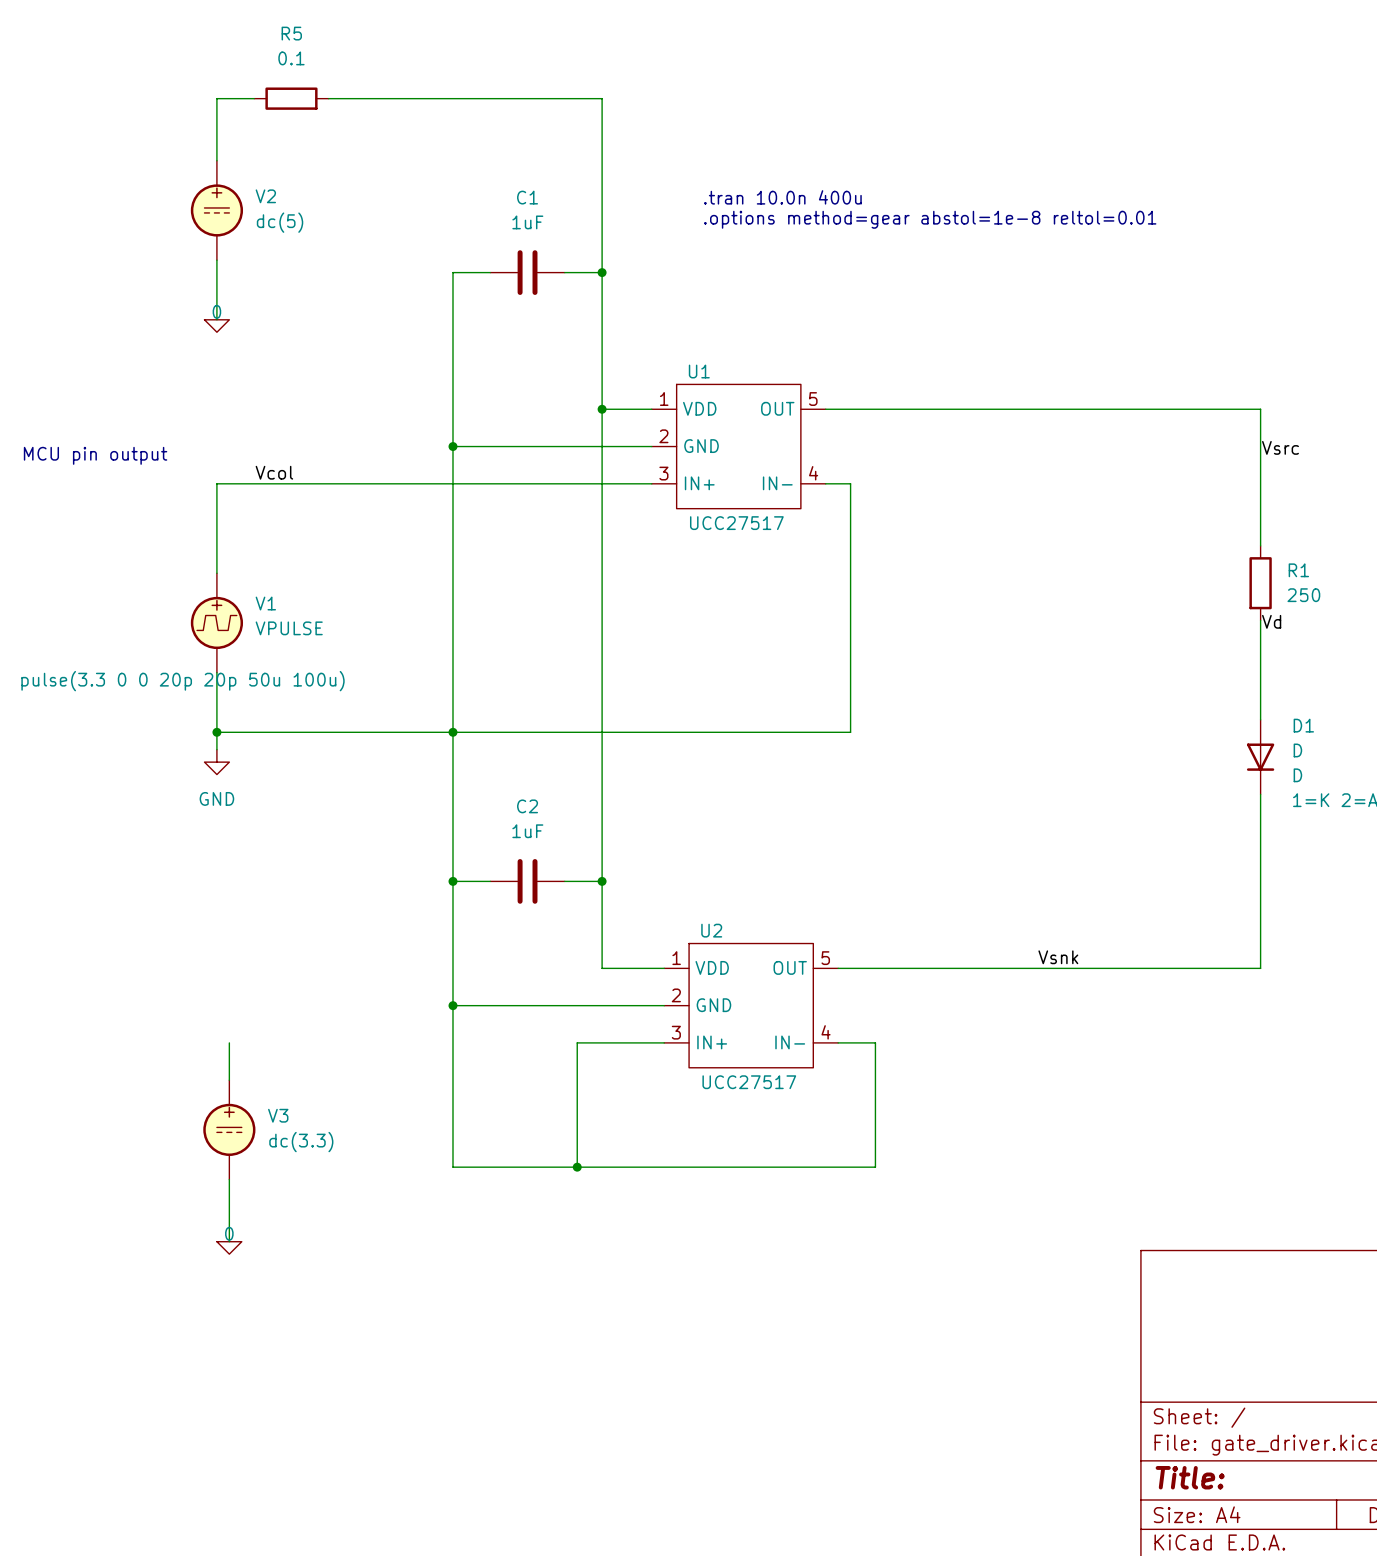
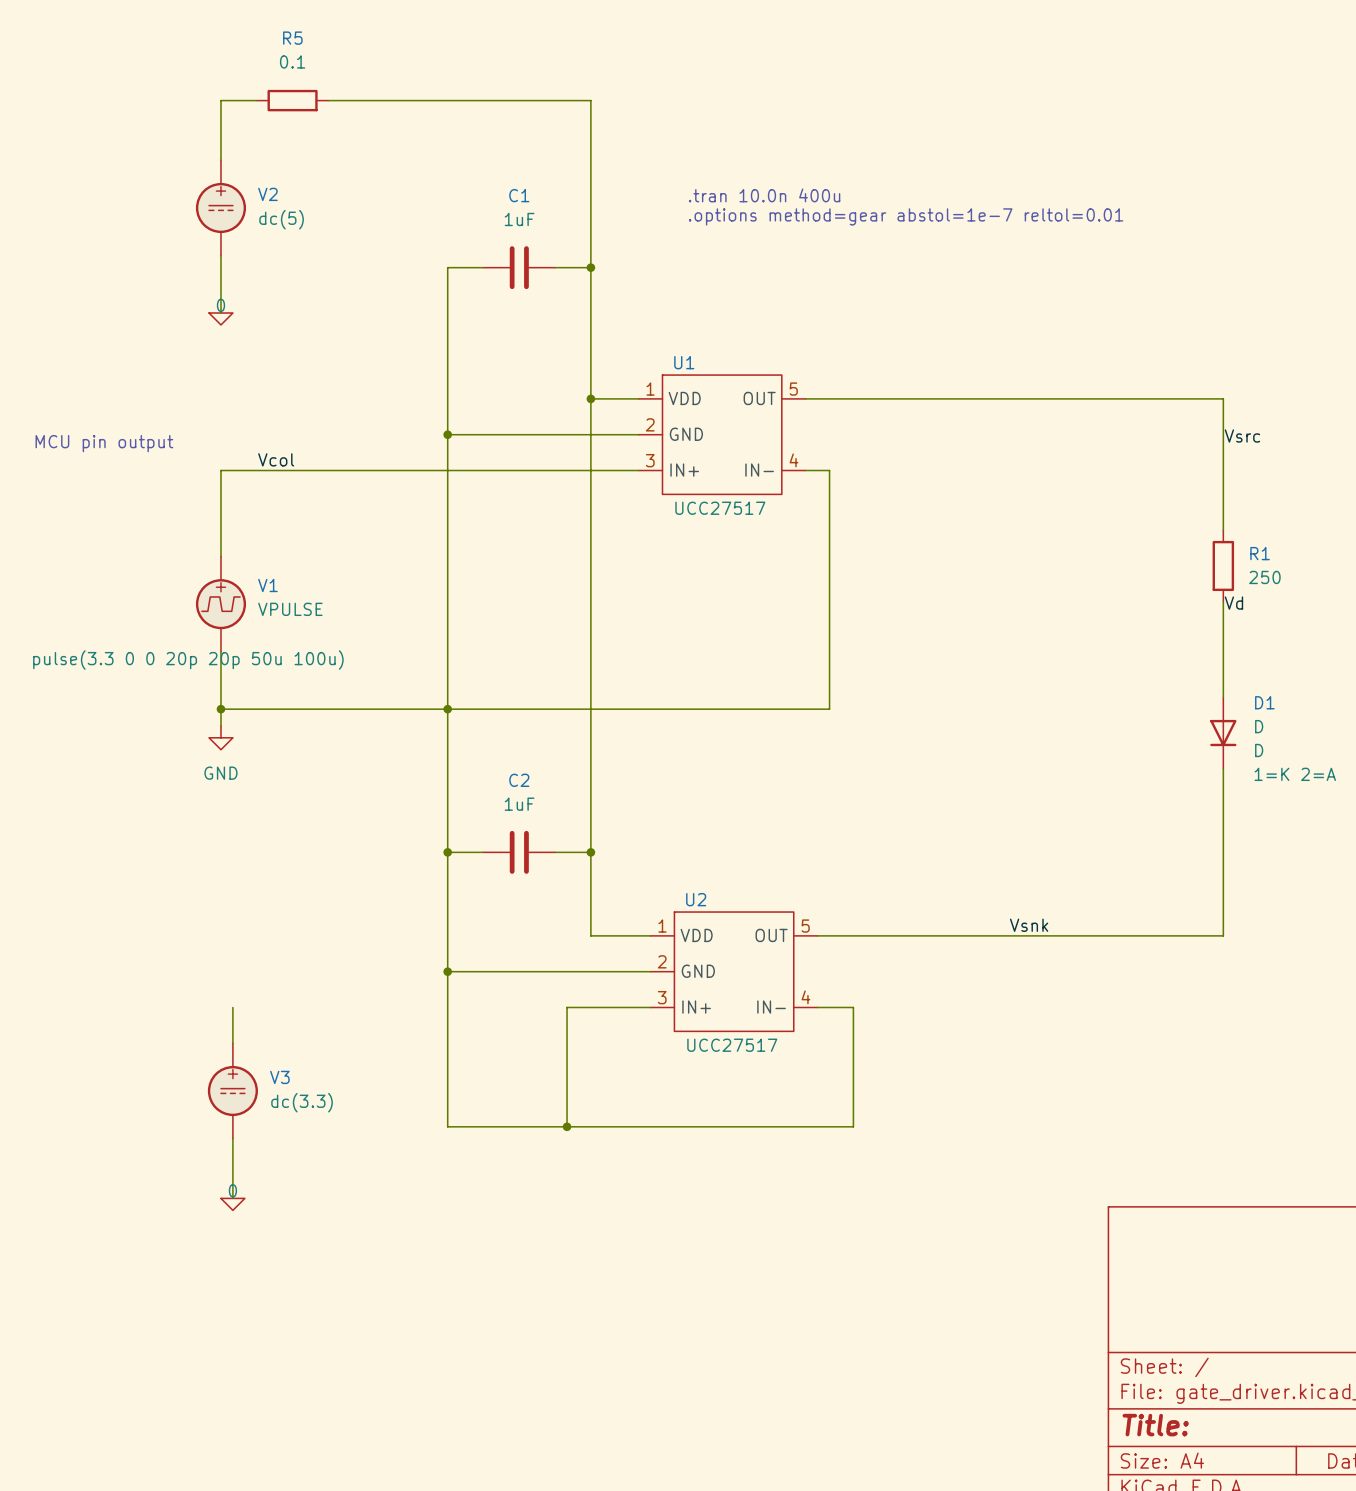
text: .options method=gear abstol=1e-8 reltol=0.01 (930, 219) -> .options method=gear abstol=1e-7 reltol=0.01 (906, 216)

